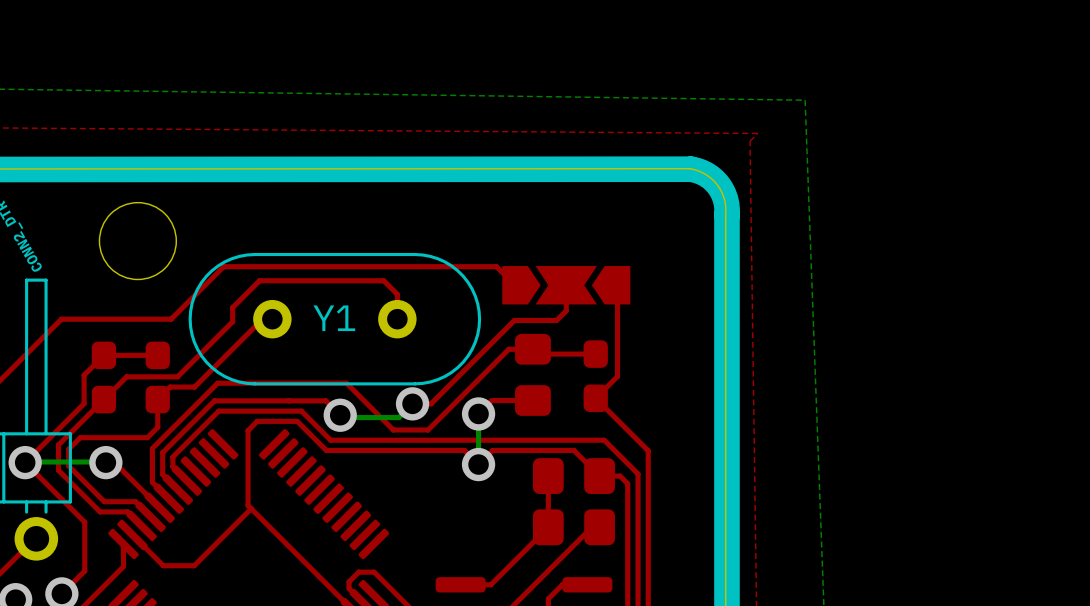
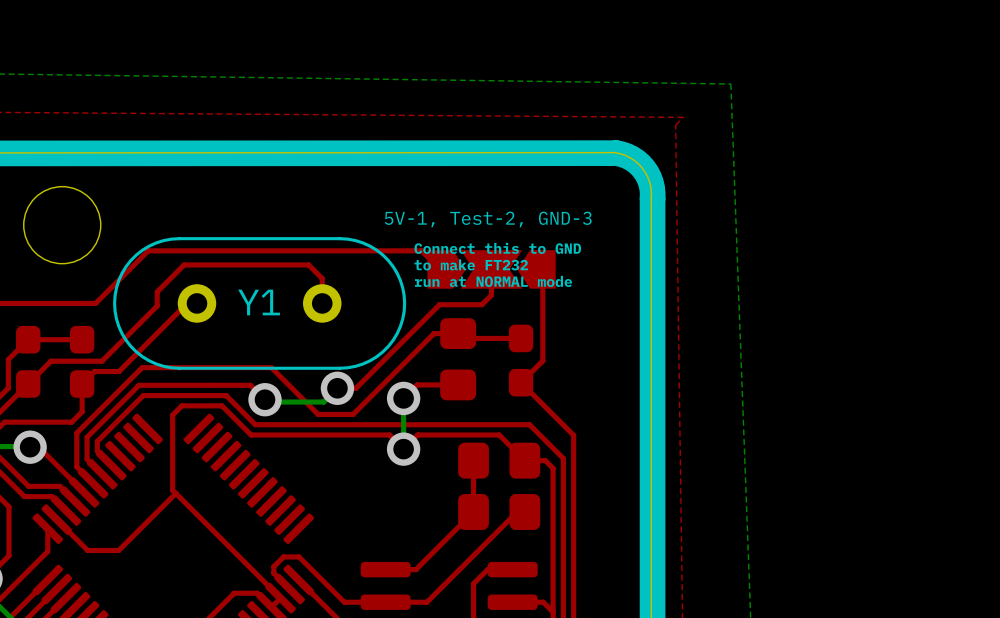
part value: none -> 5V-1, Test-2, GND-3 (488, 219)
text: none -> Connect this to GND (497, 248)
text: none -> to make FT232 (471, 264)
text: none -> run at NORMAL mode (493, 281)

